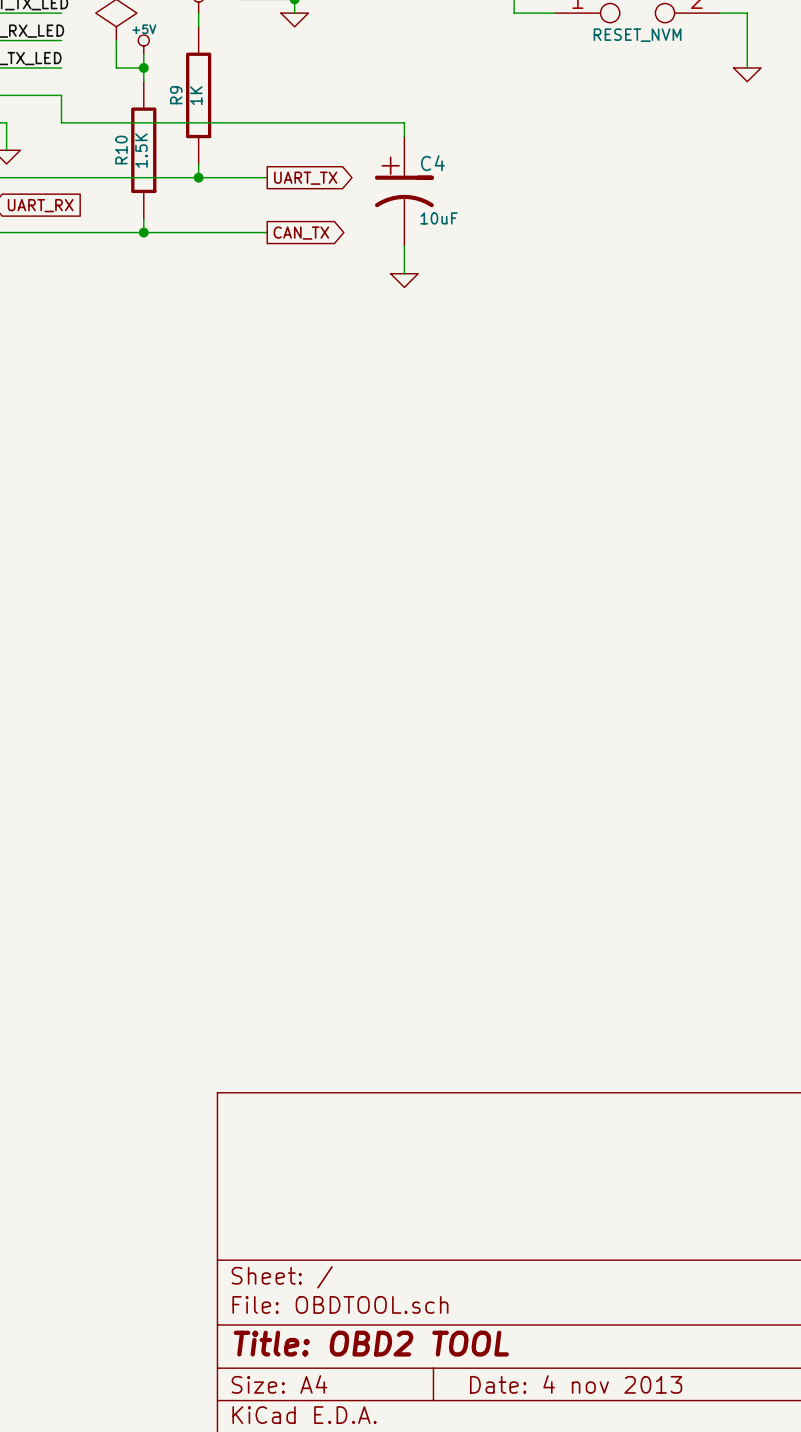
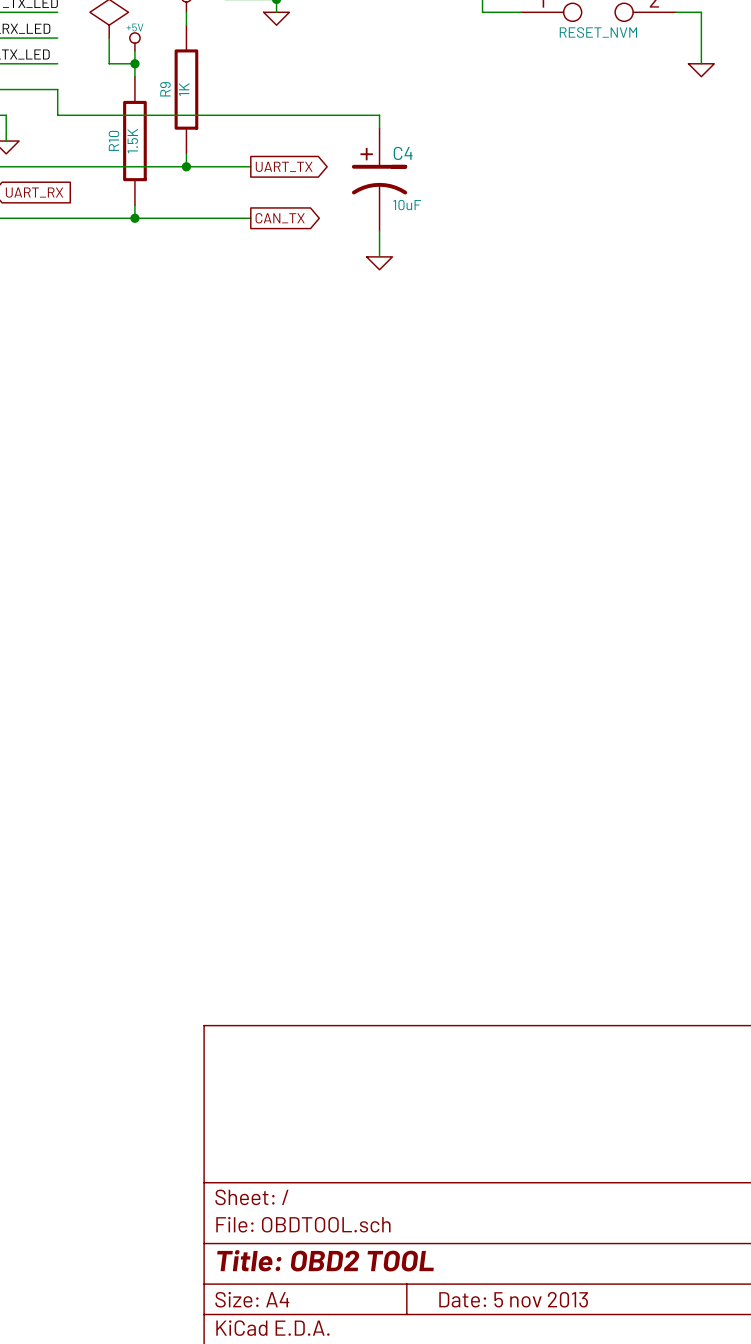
title block: Date: 4 nov 2013 (576, 1384) -> Date: 5 nov 2013 (513, 1299)

